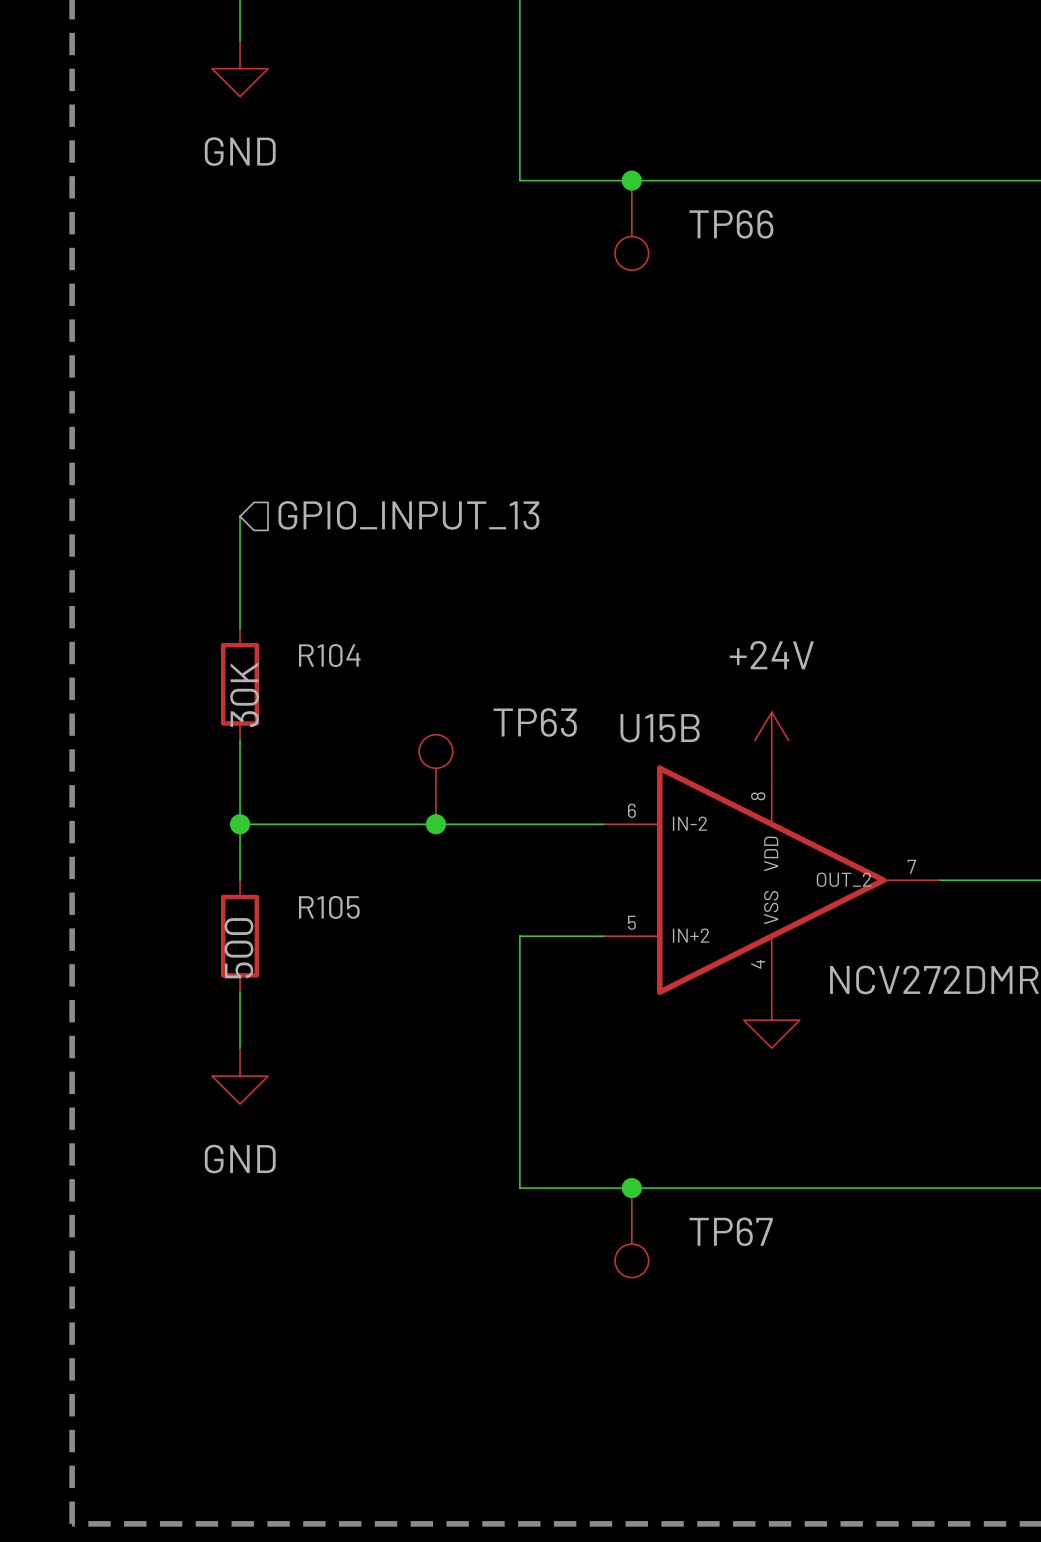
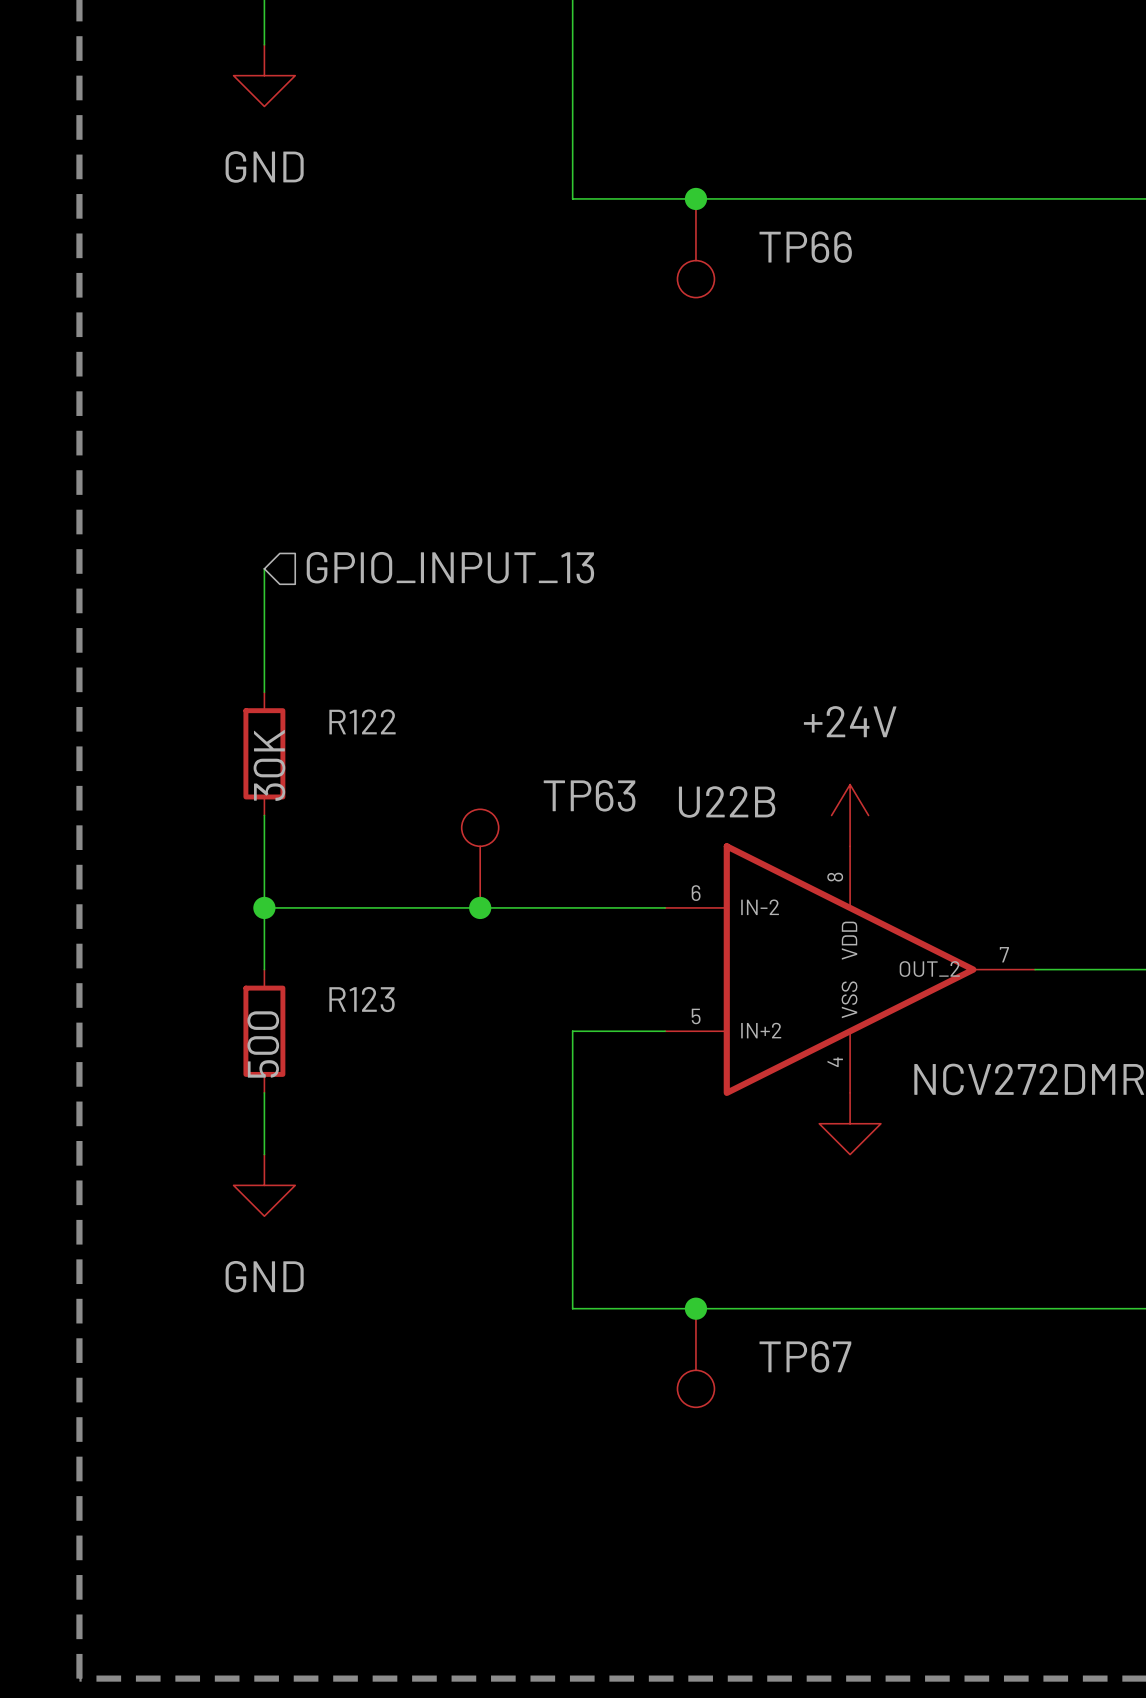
R104 name: R104 (329, 655) -> R122 (362, 721)
U15B name: U15B (660, 728) -> U22B (727, 801)
R105 name: R105 (329, 907) -> R123 (362, 999)

